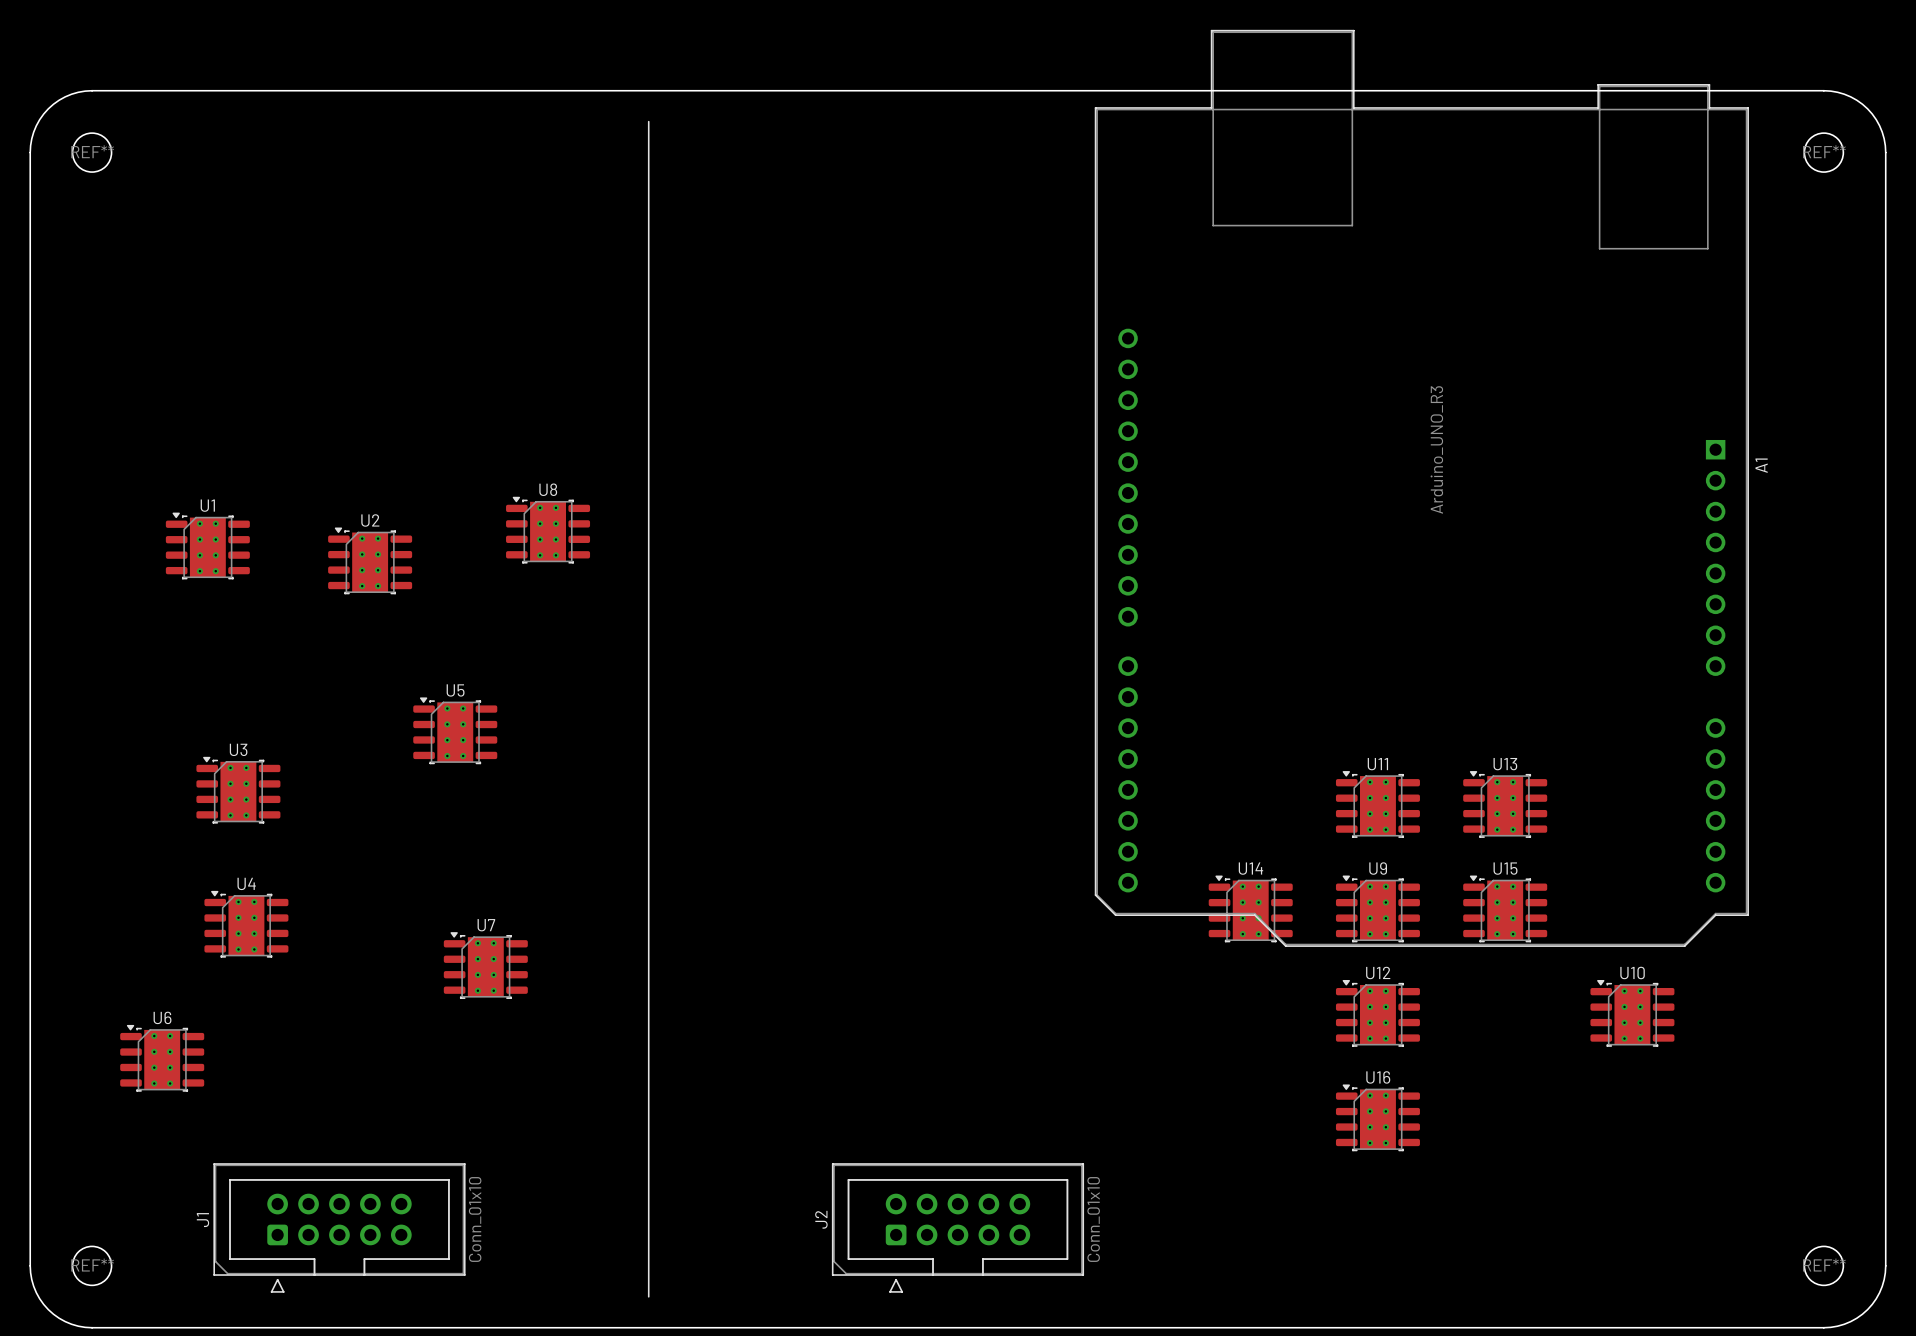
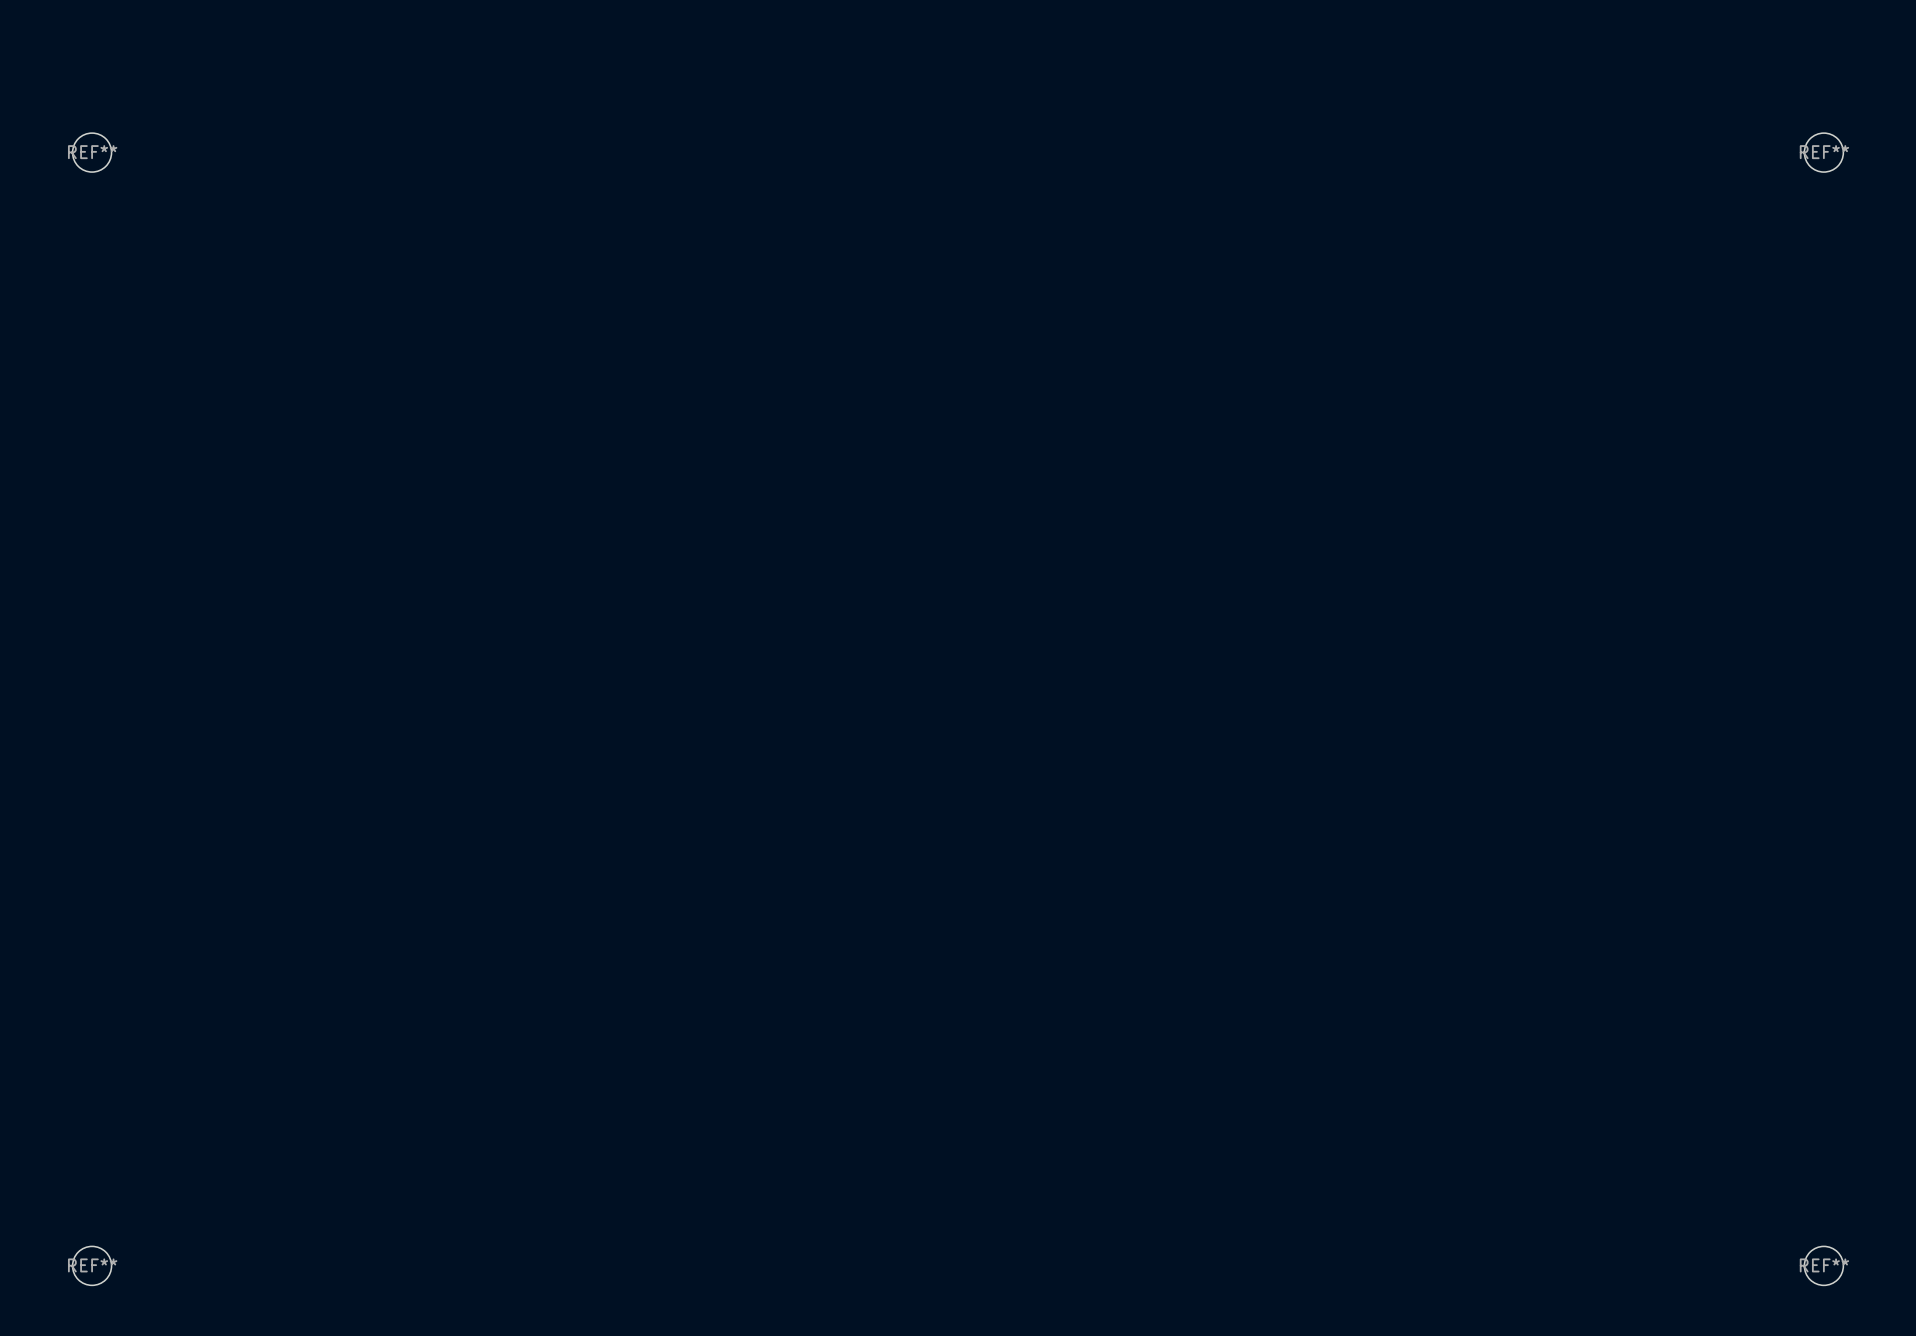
board edge: (92, 90) (1823, 90) (1844, 94) (1856, 100) (1867, 108) (1876, 119) (1882, 132) (1885, 152) (1885, 1265) (1884, 1279) (1876, 1298) (1867, 1309) (1850, 1321) (1837, 1326) (1823, 1327) (92, 1327) (71, 1324) (59, 1318) (48, 1309) (39, 1298) (33, 1286) (30, 1265) (30, 152) (33, 132) (39, 119) (48, 108) (65, 96) (78, 92) (92, 90) -> none
line: (648, 121) (648, 1296) -> none
A1: Arduino_UNO_R3 (1421, 488) -> none
U8: (548, 530) -> none
U1: (207, 545) -> none
U2: (370, 560) -> none
U5: (455, 730) -> none
U3: (238, 790) -> none
U11: (1377, 804) -> none
U13: (1505, 804) -> none
U14: (1250, 908) -> none
U9: (1377, 908) -> none
U15: (1505, 908) -> none
U4: (246, 924) -> none
U7: (485, 965) -> none
U12: (1377, 1013) -> none
U10: (1632, 1013) -> none
U6: (162, 1058) -> none
U16: (1377, 1117) -> none
J1: Conn_01x10 (339, 1227) -> none
J2: Conn_01x10 (957, 1227) -> none

